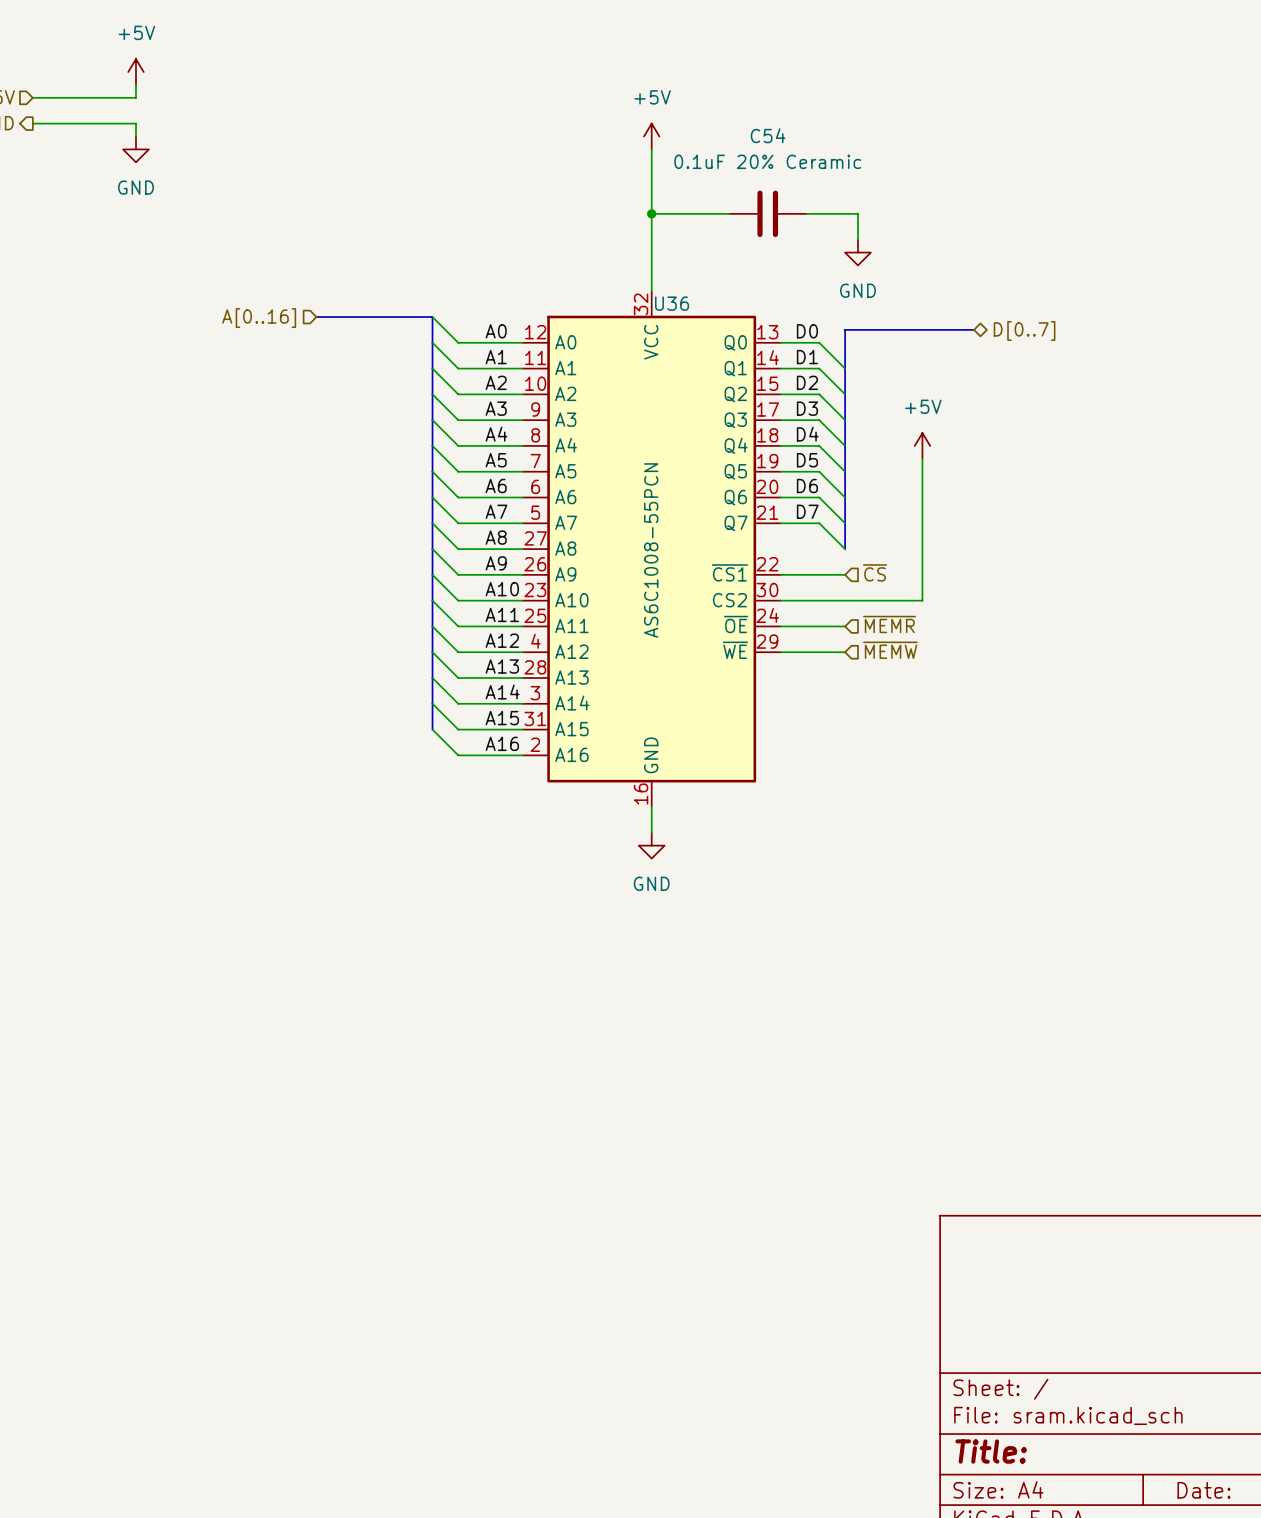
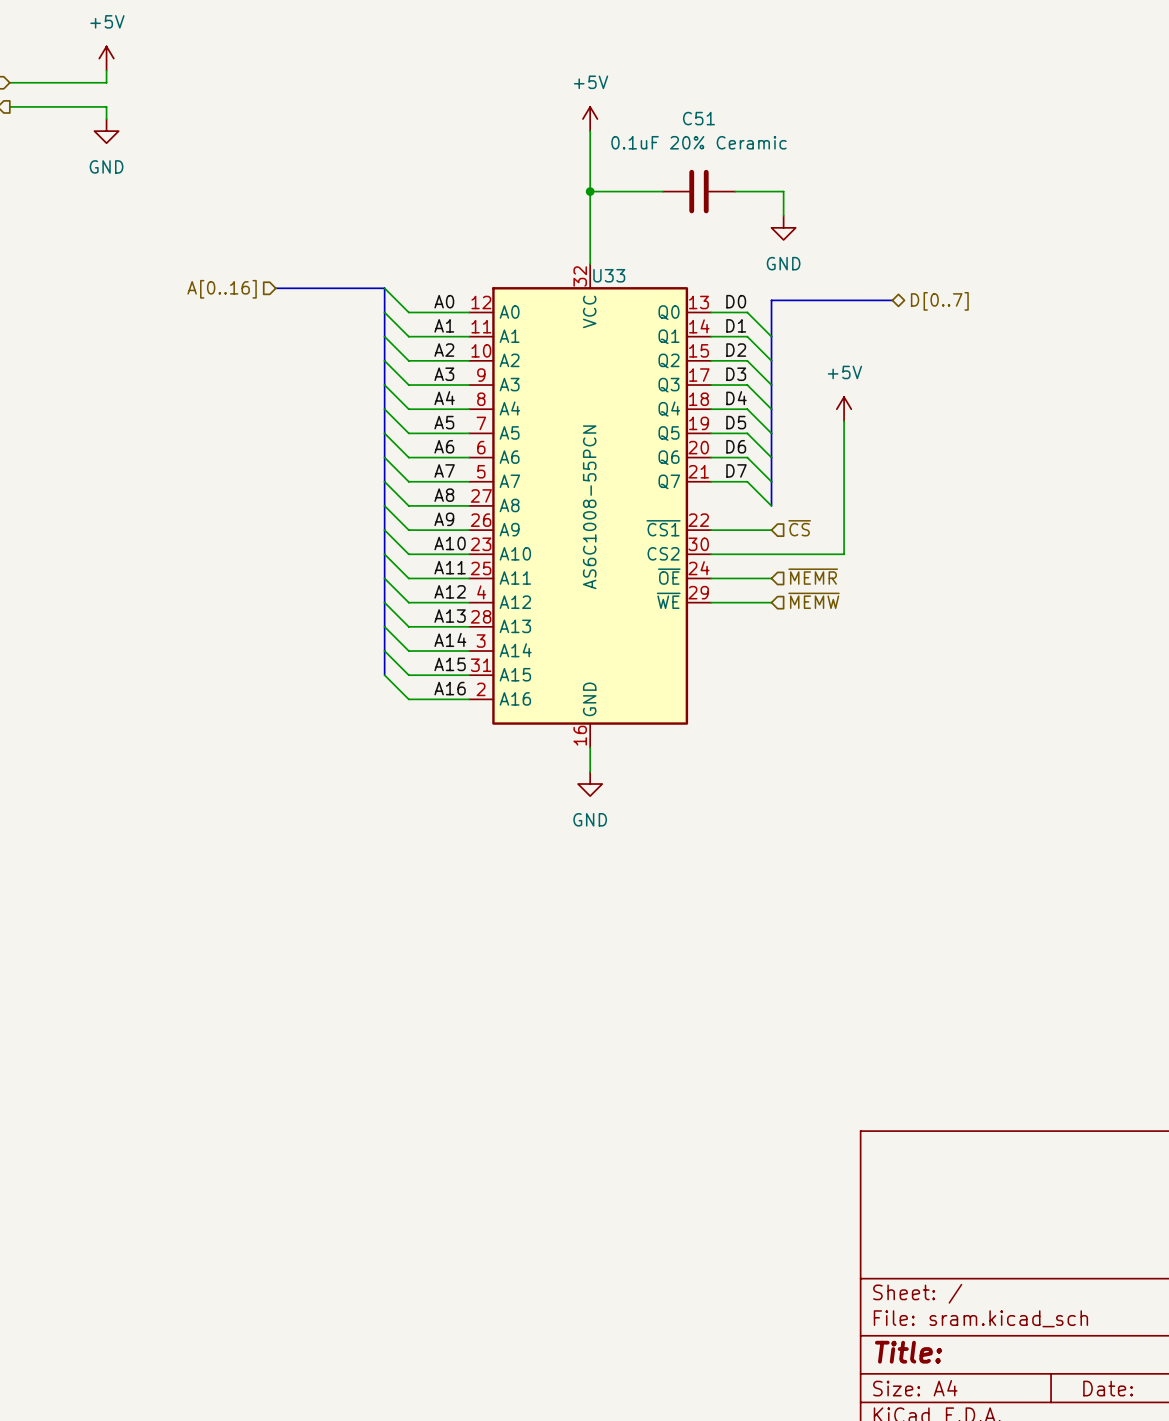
C54 name: C54 (768, 135) -> C51 (698, 118)
U36 name: U36 (672, 303) -> U33 (609, 275)

